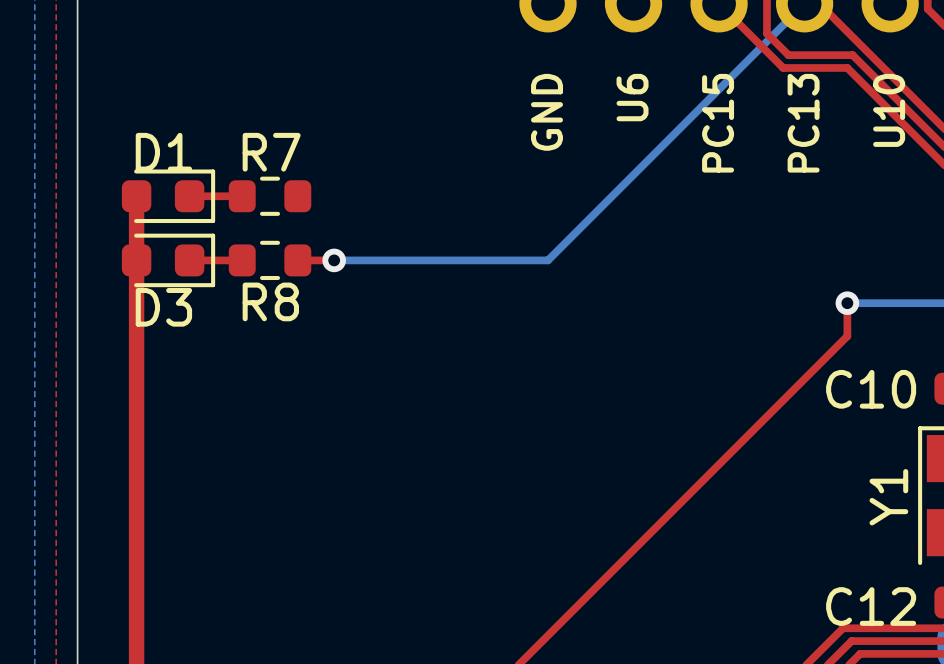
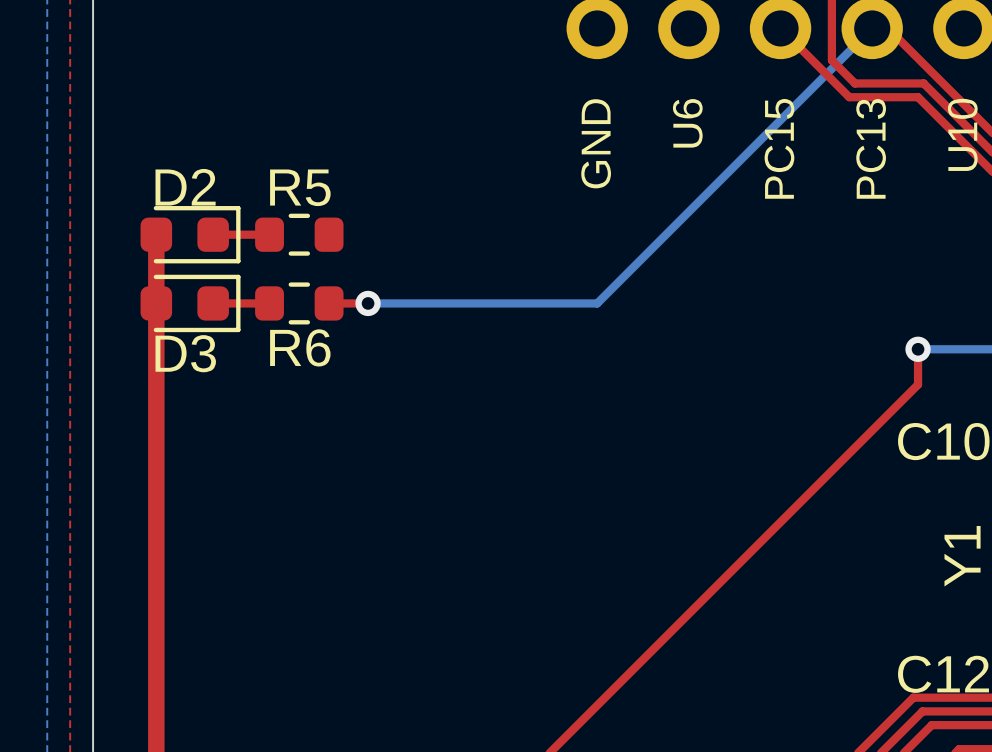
D1 name: D1 (163, 152) -> D2 (185, 187)
R7 name: R7 (271, 152) -> R5 (300, 187)
R8 name: R8 (270, 301) -> R6 (300, 347)

